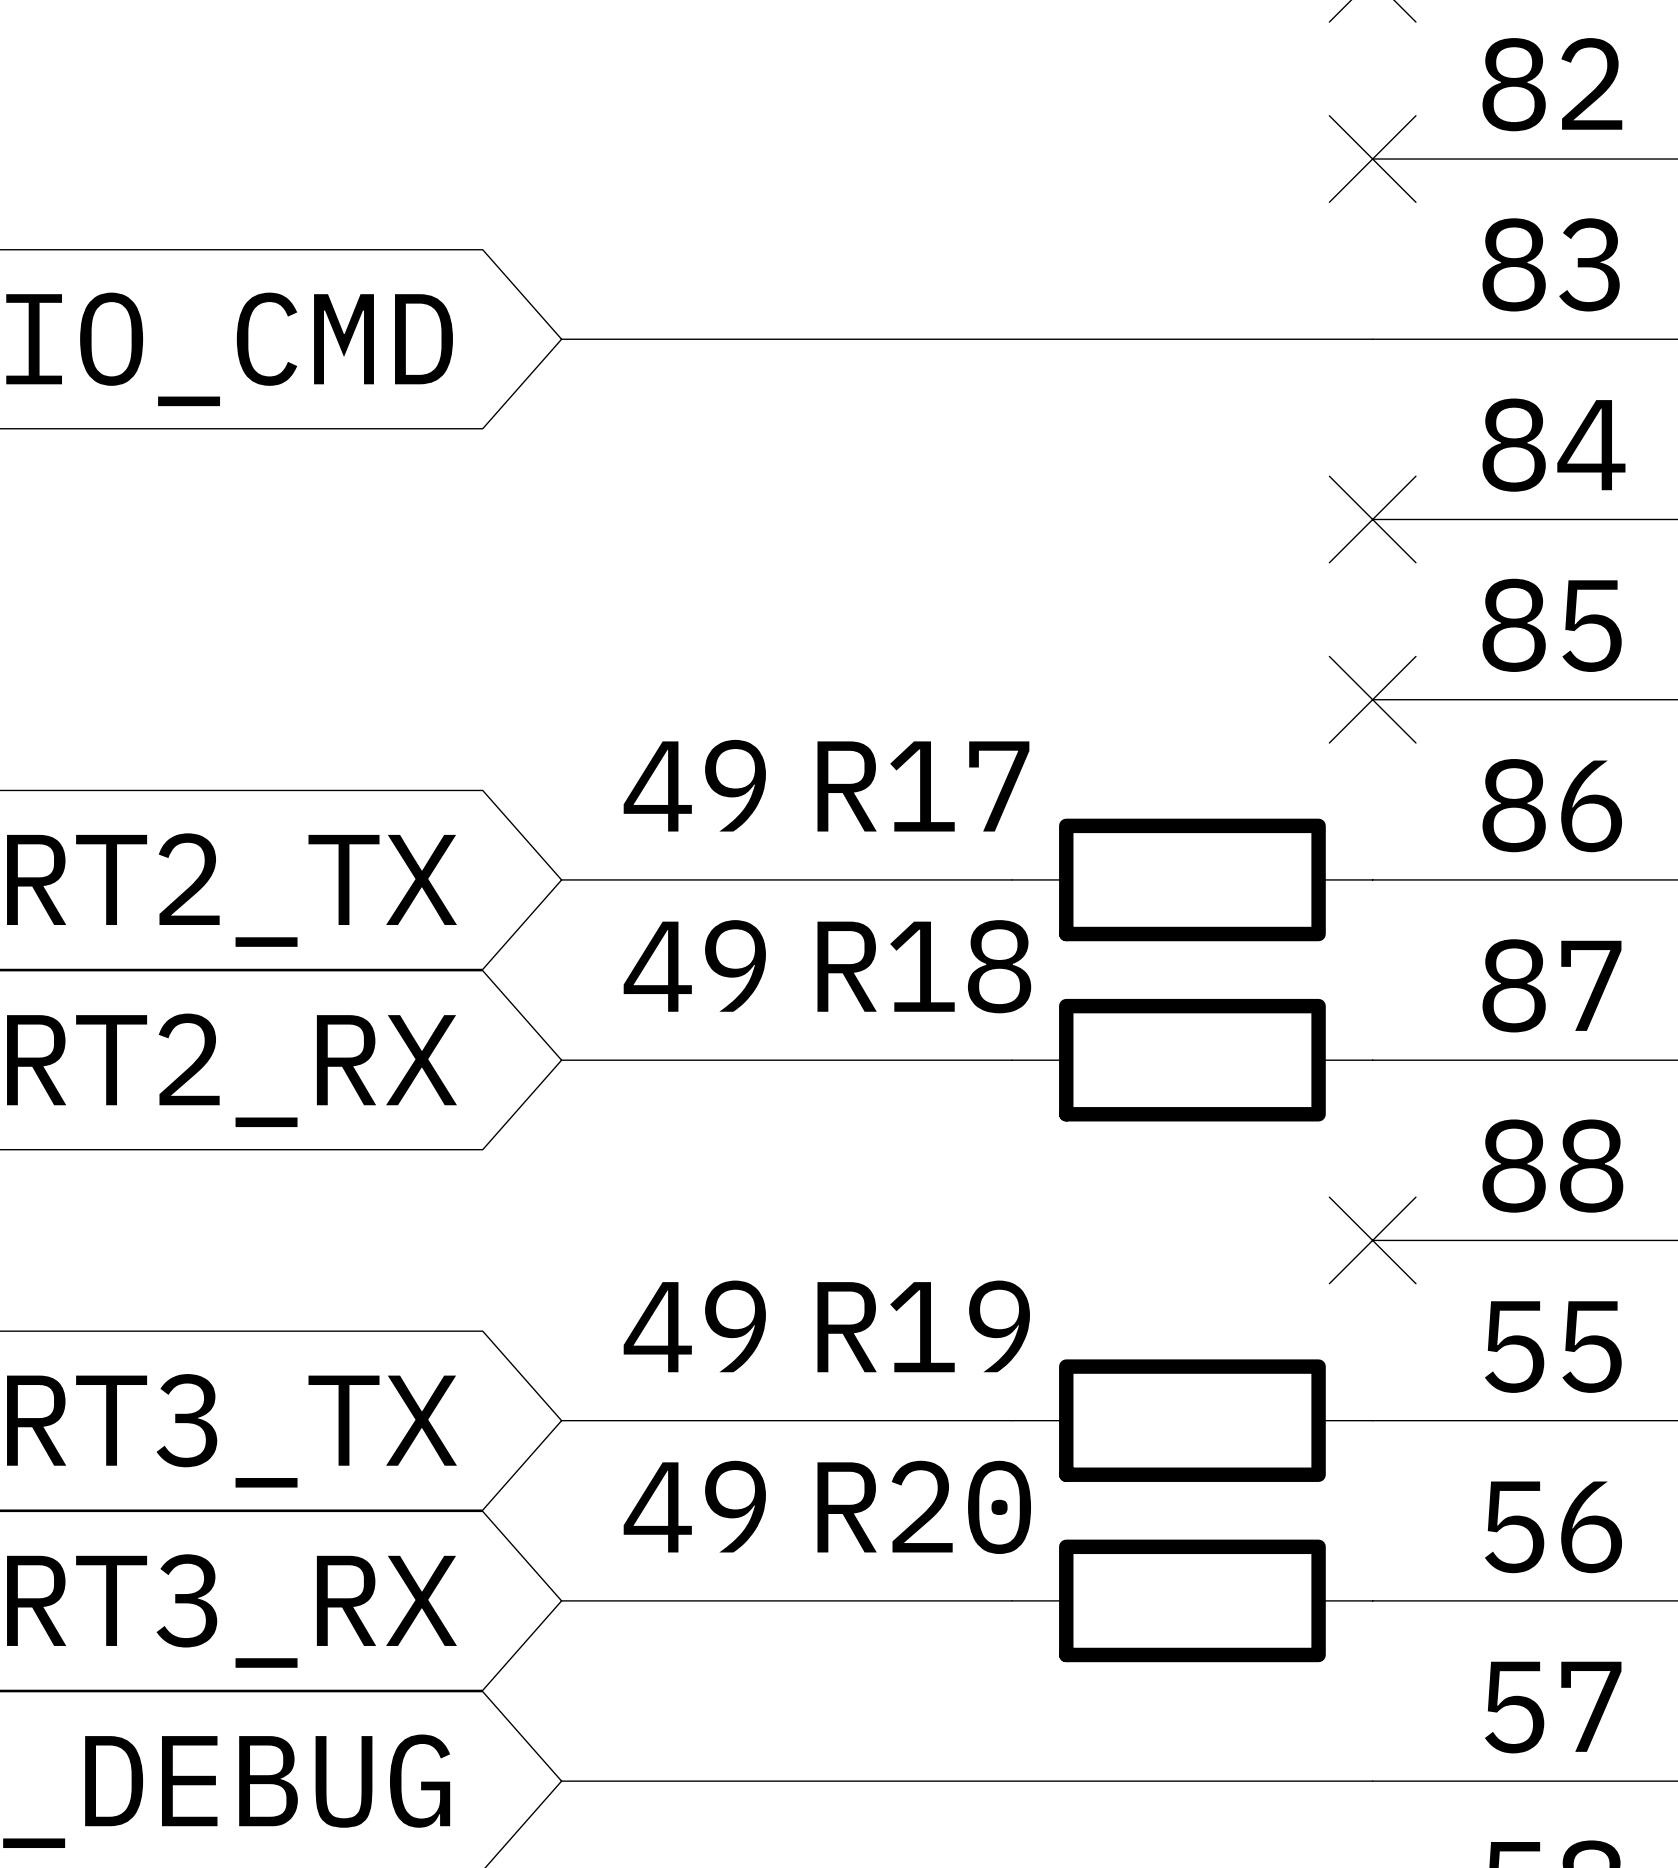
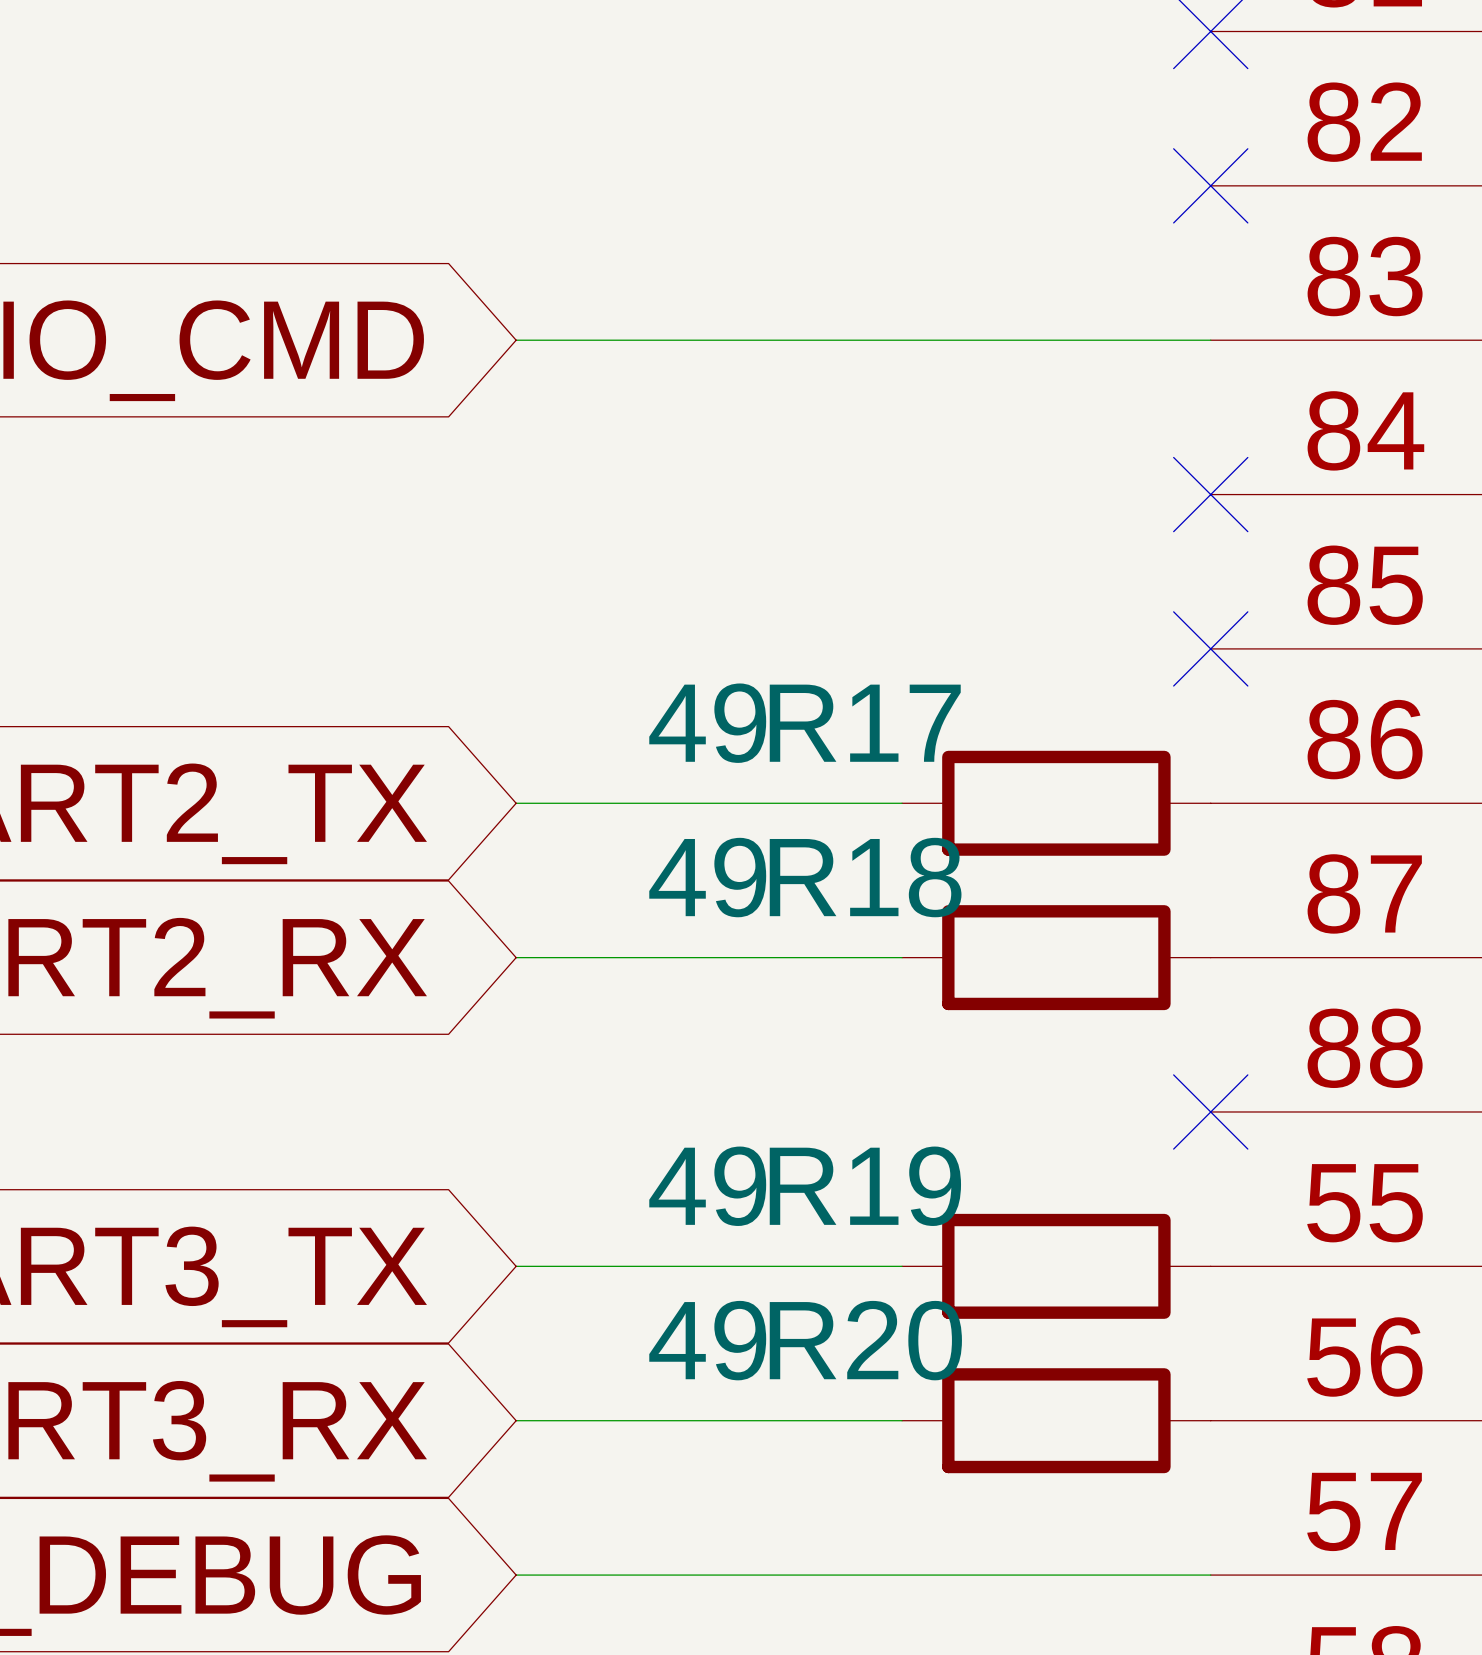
R17 value position: 49 (694, 785) -> 49 (707, 723)
R17 name position: R17 (923, 786) -> R17 (865, 723)
R18 value position: 49 (694, 965) -> 49 (707, 877)
R18 name position: R18 (924, 966) -> R18 (865, 877)
R19 value position: 49 (694, 1326) -> 49 (707, 1186)
R19 name position: R19 (923, 1326) -> R19 (865, 1186)
R20 value position: 49 (694, 1506) -> 49 (707, 1340)
R20 name position: R20 (924, 1507) -> R20 (865, 1340)

